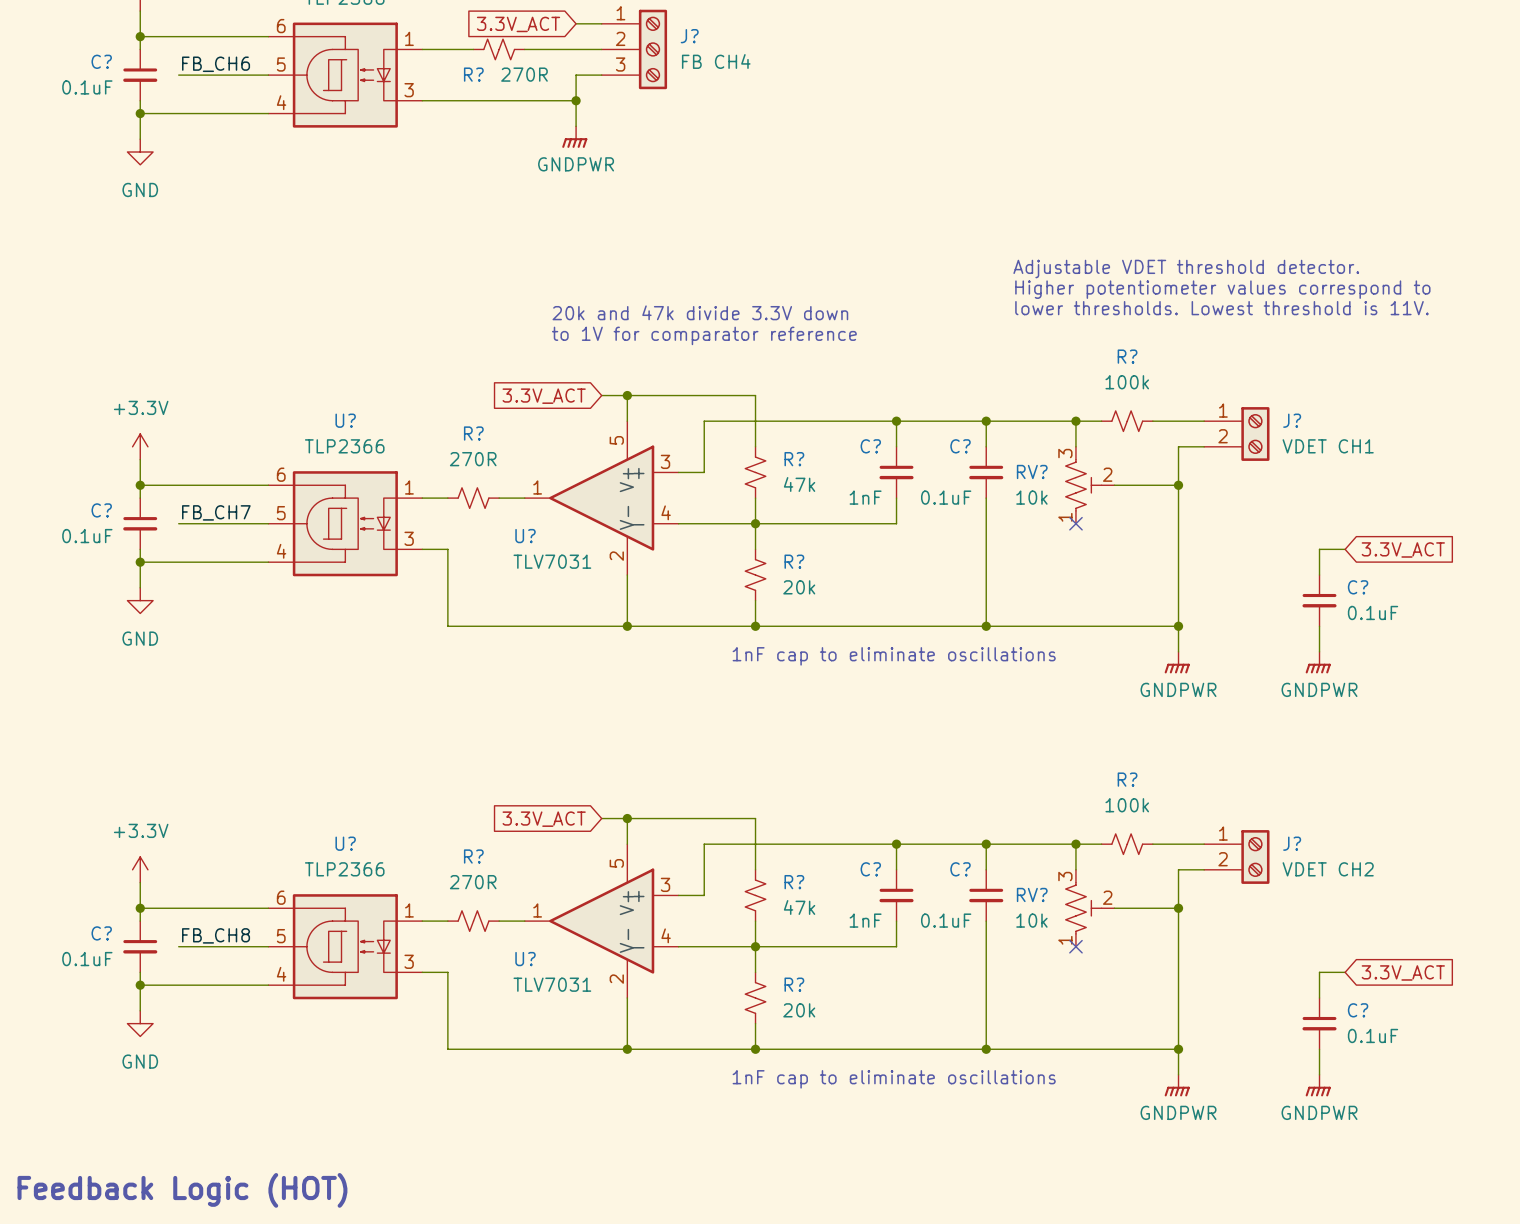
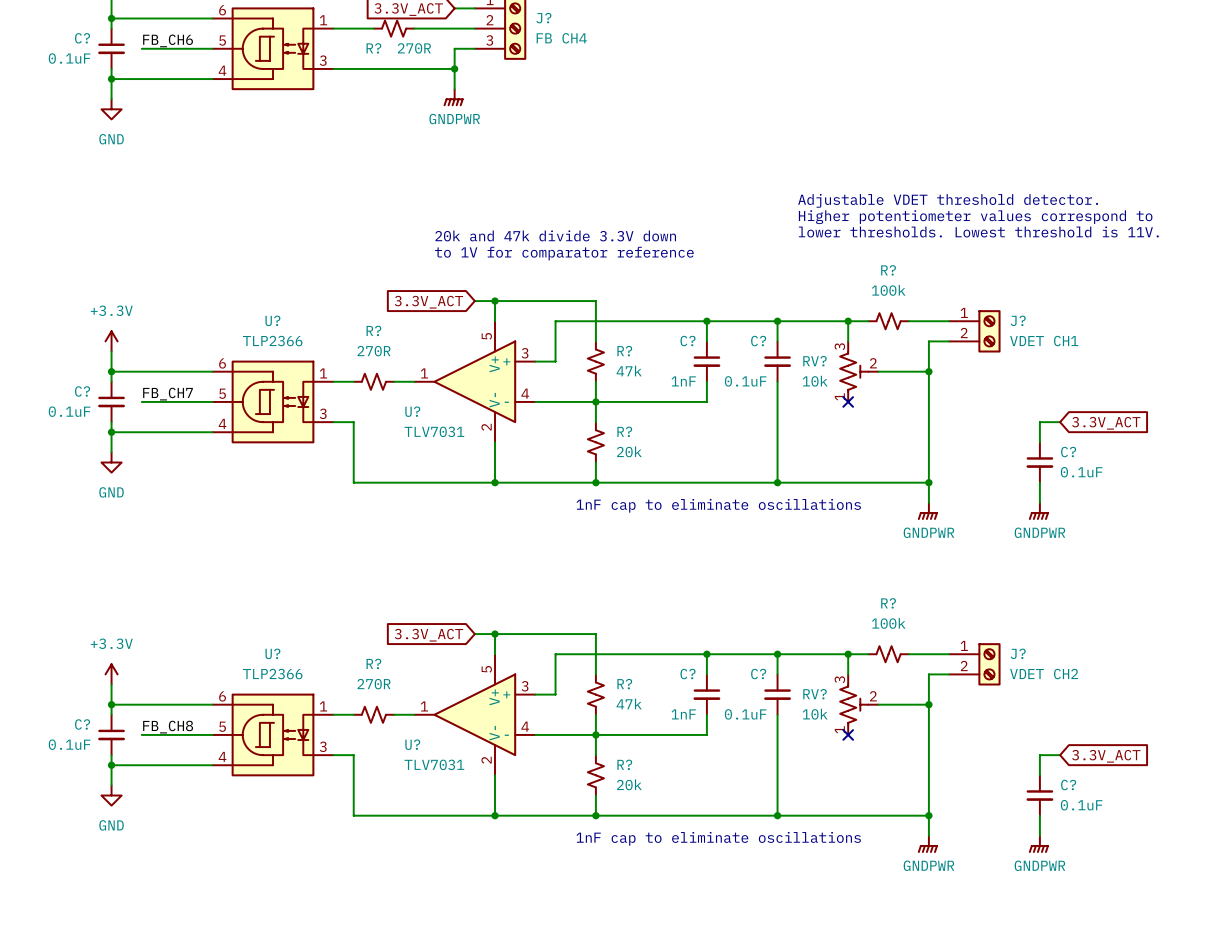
text: Feedback Logic (HOT) (182, 1190) -> none

